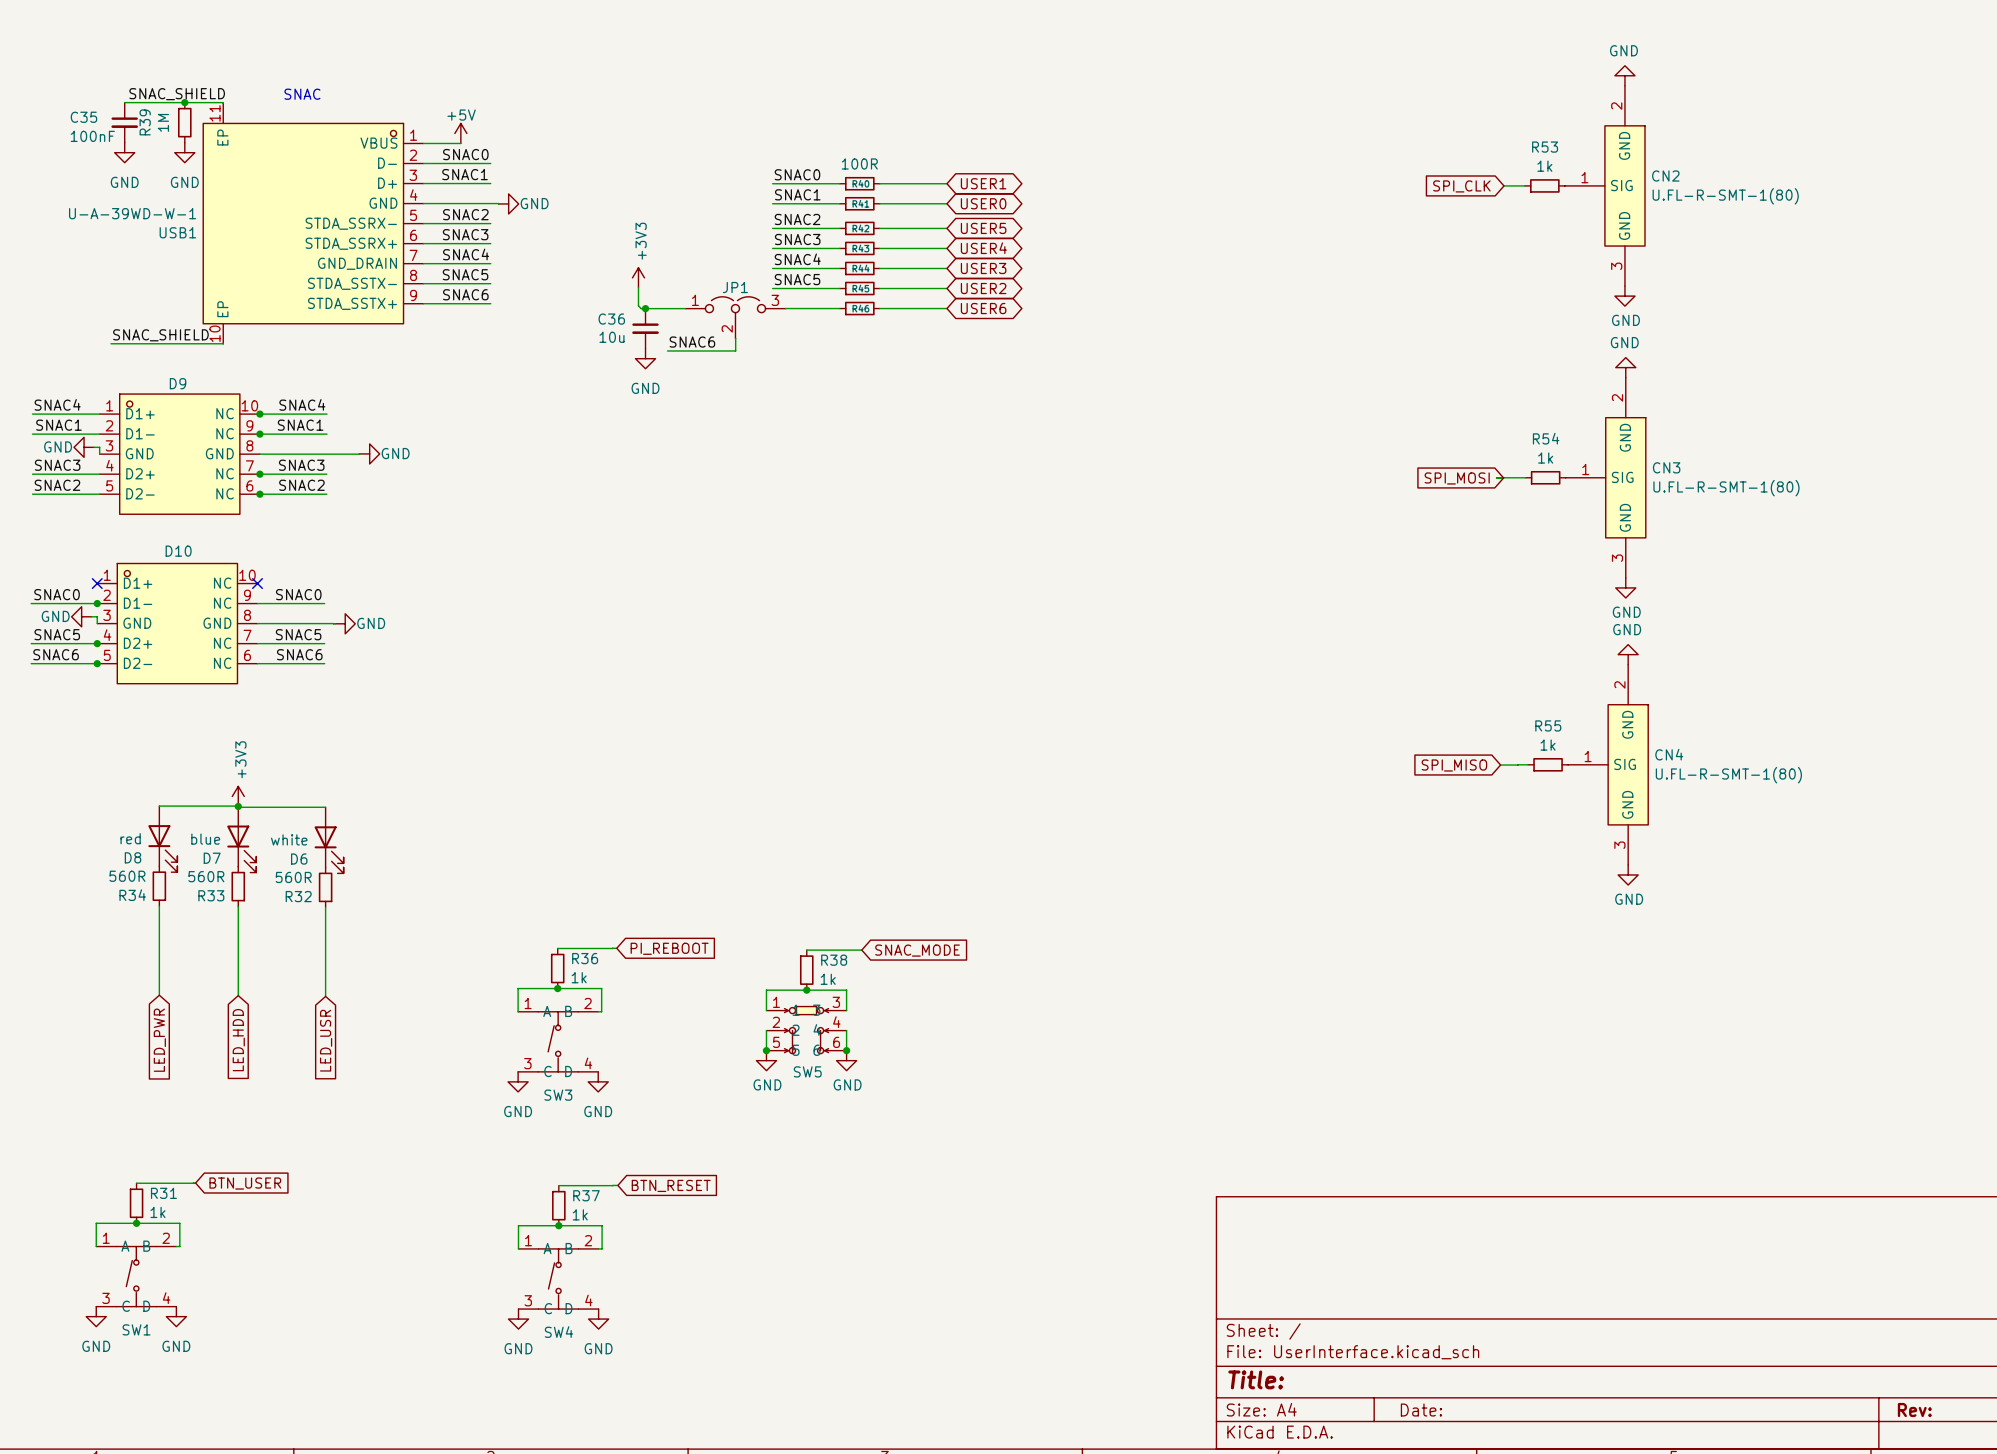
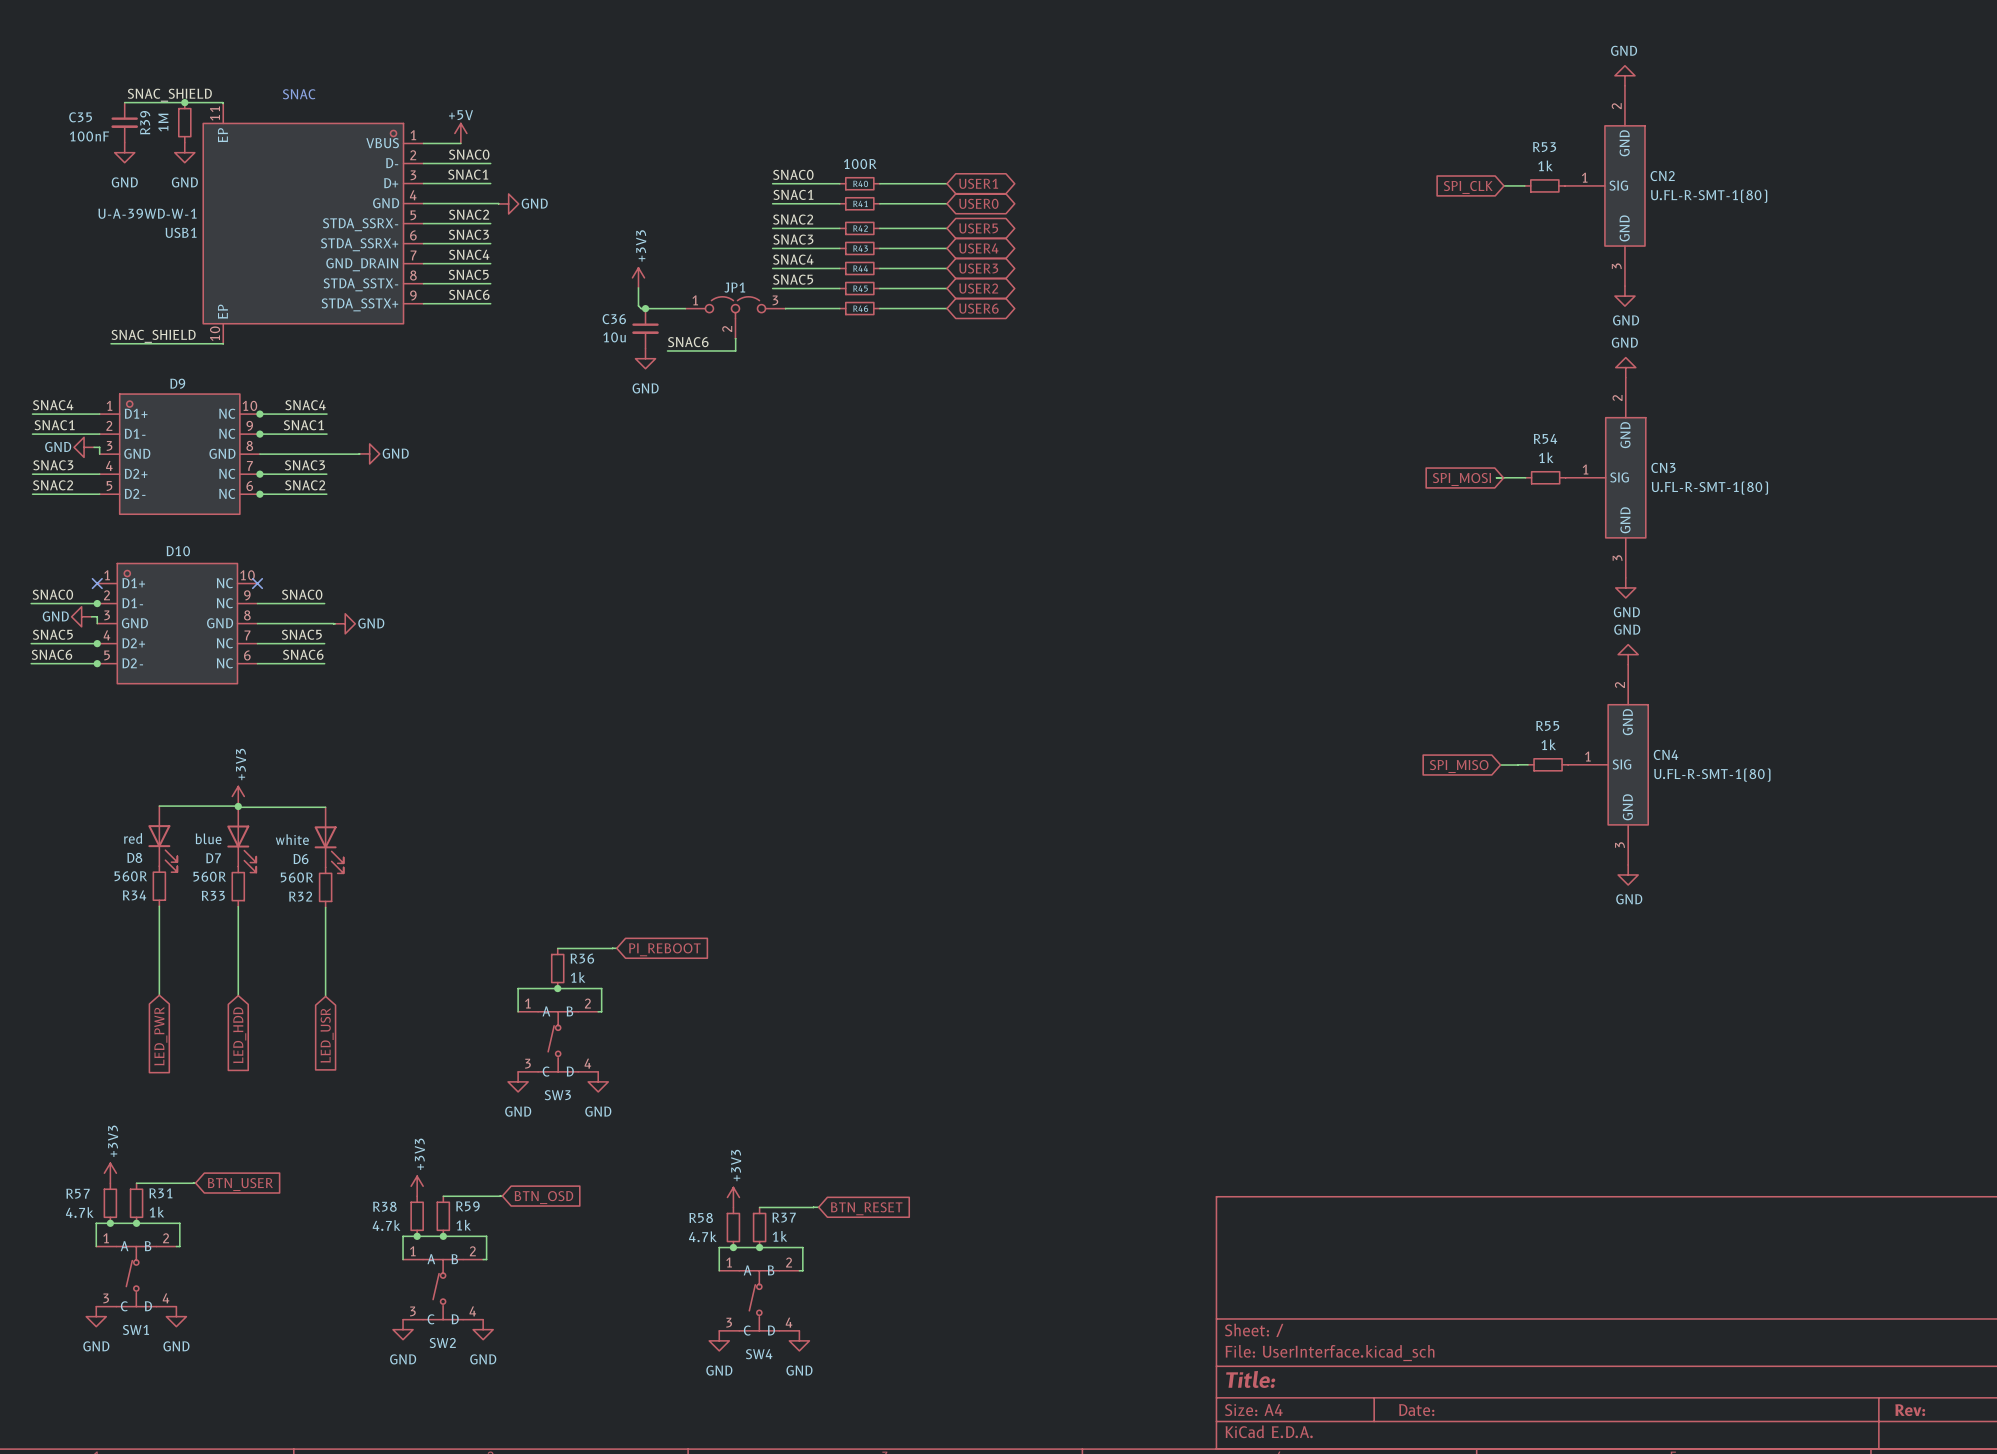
wire: (806, 950) (861, 950) -> none
global label: SNAC_MODE (917, 950) -> none
R38 name position: R38 (834, 960) -> R38 (384, 1206)
R38 position: (806, 970) -> (417, 1216)
R38 value: 1k (828, 979) -> 4.7k (386, 1225)
junction: (806, 990) -> none
wire: (766, 1010) (766, 990) (846, 990) (846, 1010) -> none
wire: (766, 1030) (766, 1050) -> none
SW5: (806, 1030) -> none
wire: (846, 1030) (846, 1050) -> none
junction: (766, 1050) -> none
junction: (846, 1050) -> none
power symbol: GND (766, 1060) -> none
power symbol: GND (846, 1060) -> none
power symbol: none -> +3V3 (110, 1173)
wire: (617, 1185) (558, 1185) -> none
global label: BTN_RESET (671, 1185) -> none
power symbol: none -> +3V3 (417, 1186)
wire: none -> (502, 1196) (443, 1196)
global label: none -> BTN_OSD (543, 1197)
power symbol: none -> +3V3 (733, 1197)
R57: none -> 4.7k (110, 1203)
R37 position: (558, 1205) -> (759, 1227)
wire: none -> (818, 1207) (759, 1207)
global label: none -> BTN_RESET (866, 1208)
R59: none -> 1k (443, 1216)
junction: none -> (110, 1223)
junction: (558, 1225) -> none
R58: none -> 4.7k (733, 1227)
junction: none -> (417, 1236)
junction: none -> (443, 1236)
junction: none -> (733, 1247)
junction: none -> (759, 1247)
wire: (518, 1248) (518, 1225) (602, 1225) (602, 1248) (598, 1248) -> (403, 1259) (403, 1236) (486, 1236) (486, 1259) (483, 1259)
wire: none -> (719, 1270) (719, 1247) (802, 1247) (802, 1270) (799, 1270)
SW4 position: (558, 1278) -> (759, 1300)
SW2: none -> (443, 1289)
power symbol position: GND (518, 1319) -> GND (483, 1329)
power symbol: GND (598, 1319) -> none
power symbol: none -> GND (403, 1329)
power symbol: none -> GND (719, 1340)
power symbol: none -> GND (799, 1340)

